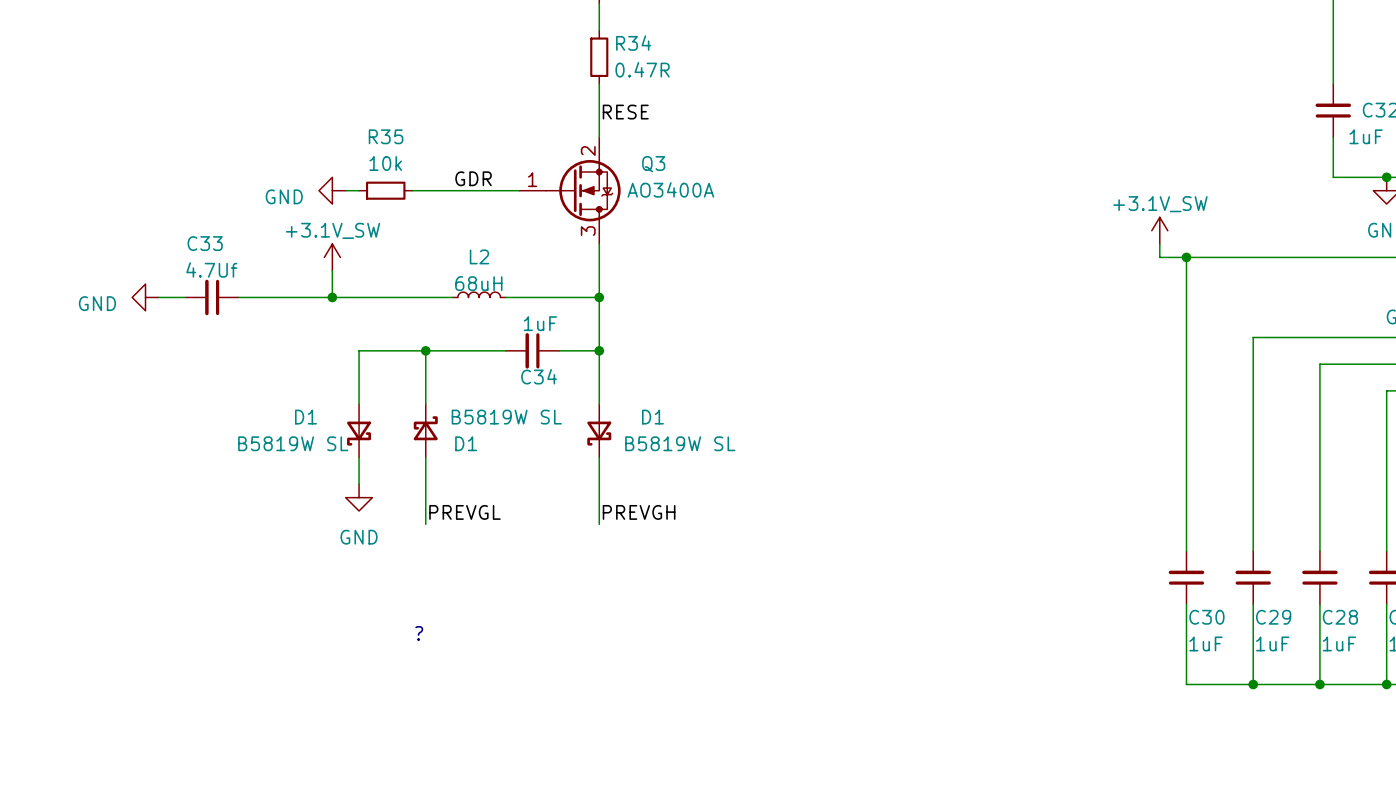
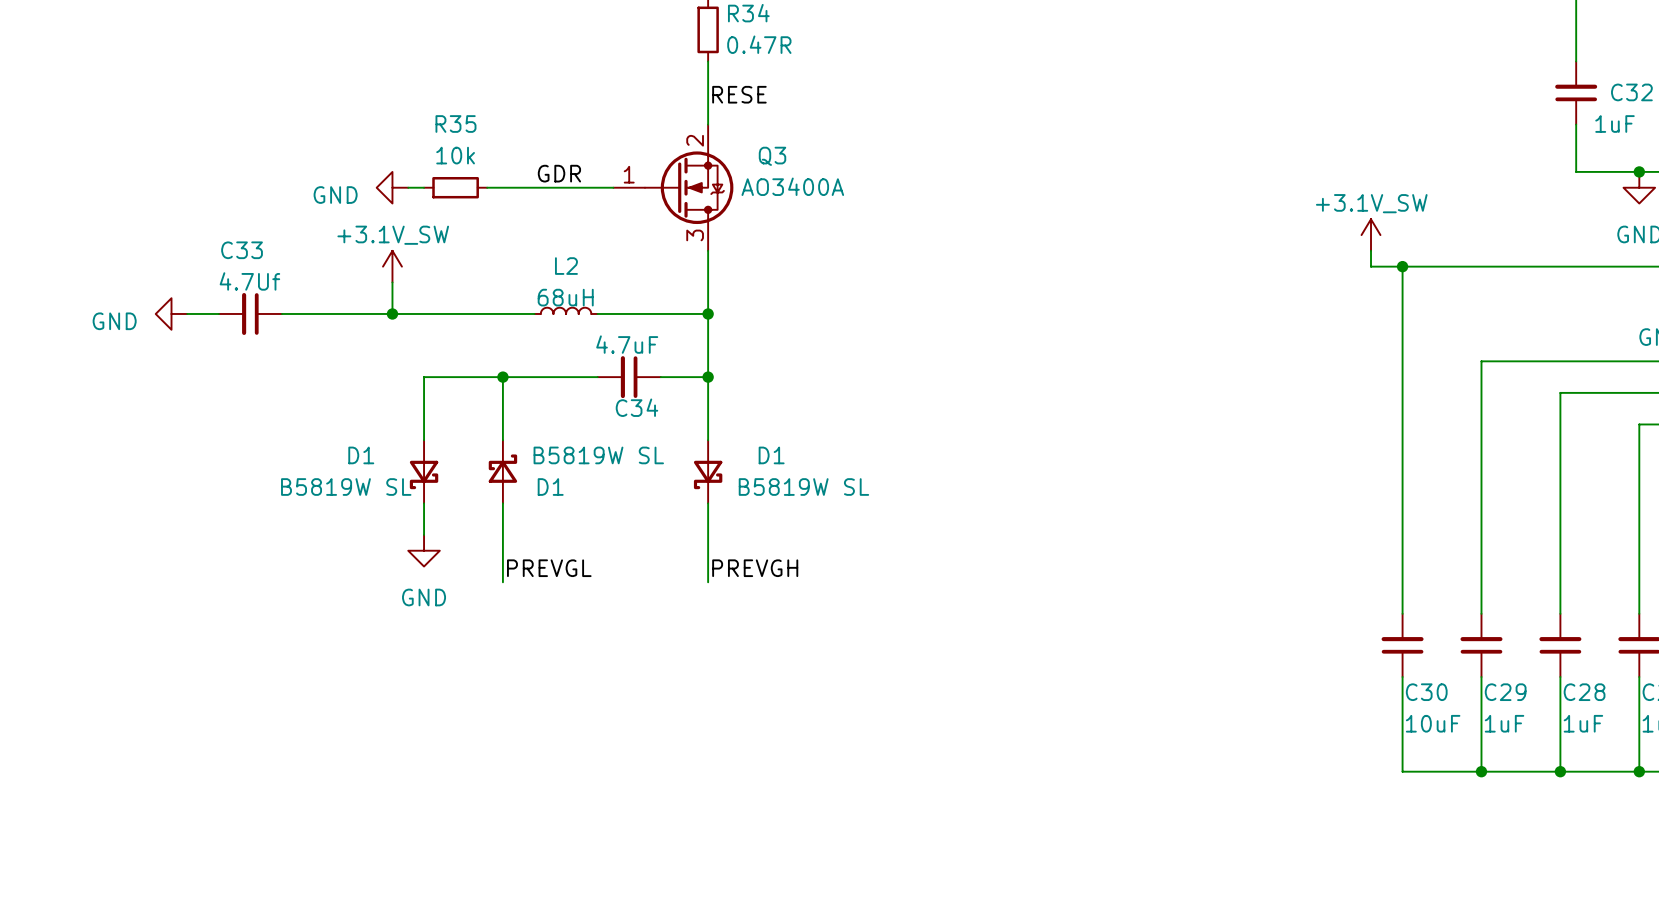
C34 value: 1uF (540, 323) -> 4.7uF (627, 344)
text: ? (419, 633) -> none
C30 value: 1uF (1205, 643) -> 10uF (1433, 723)

